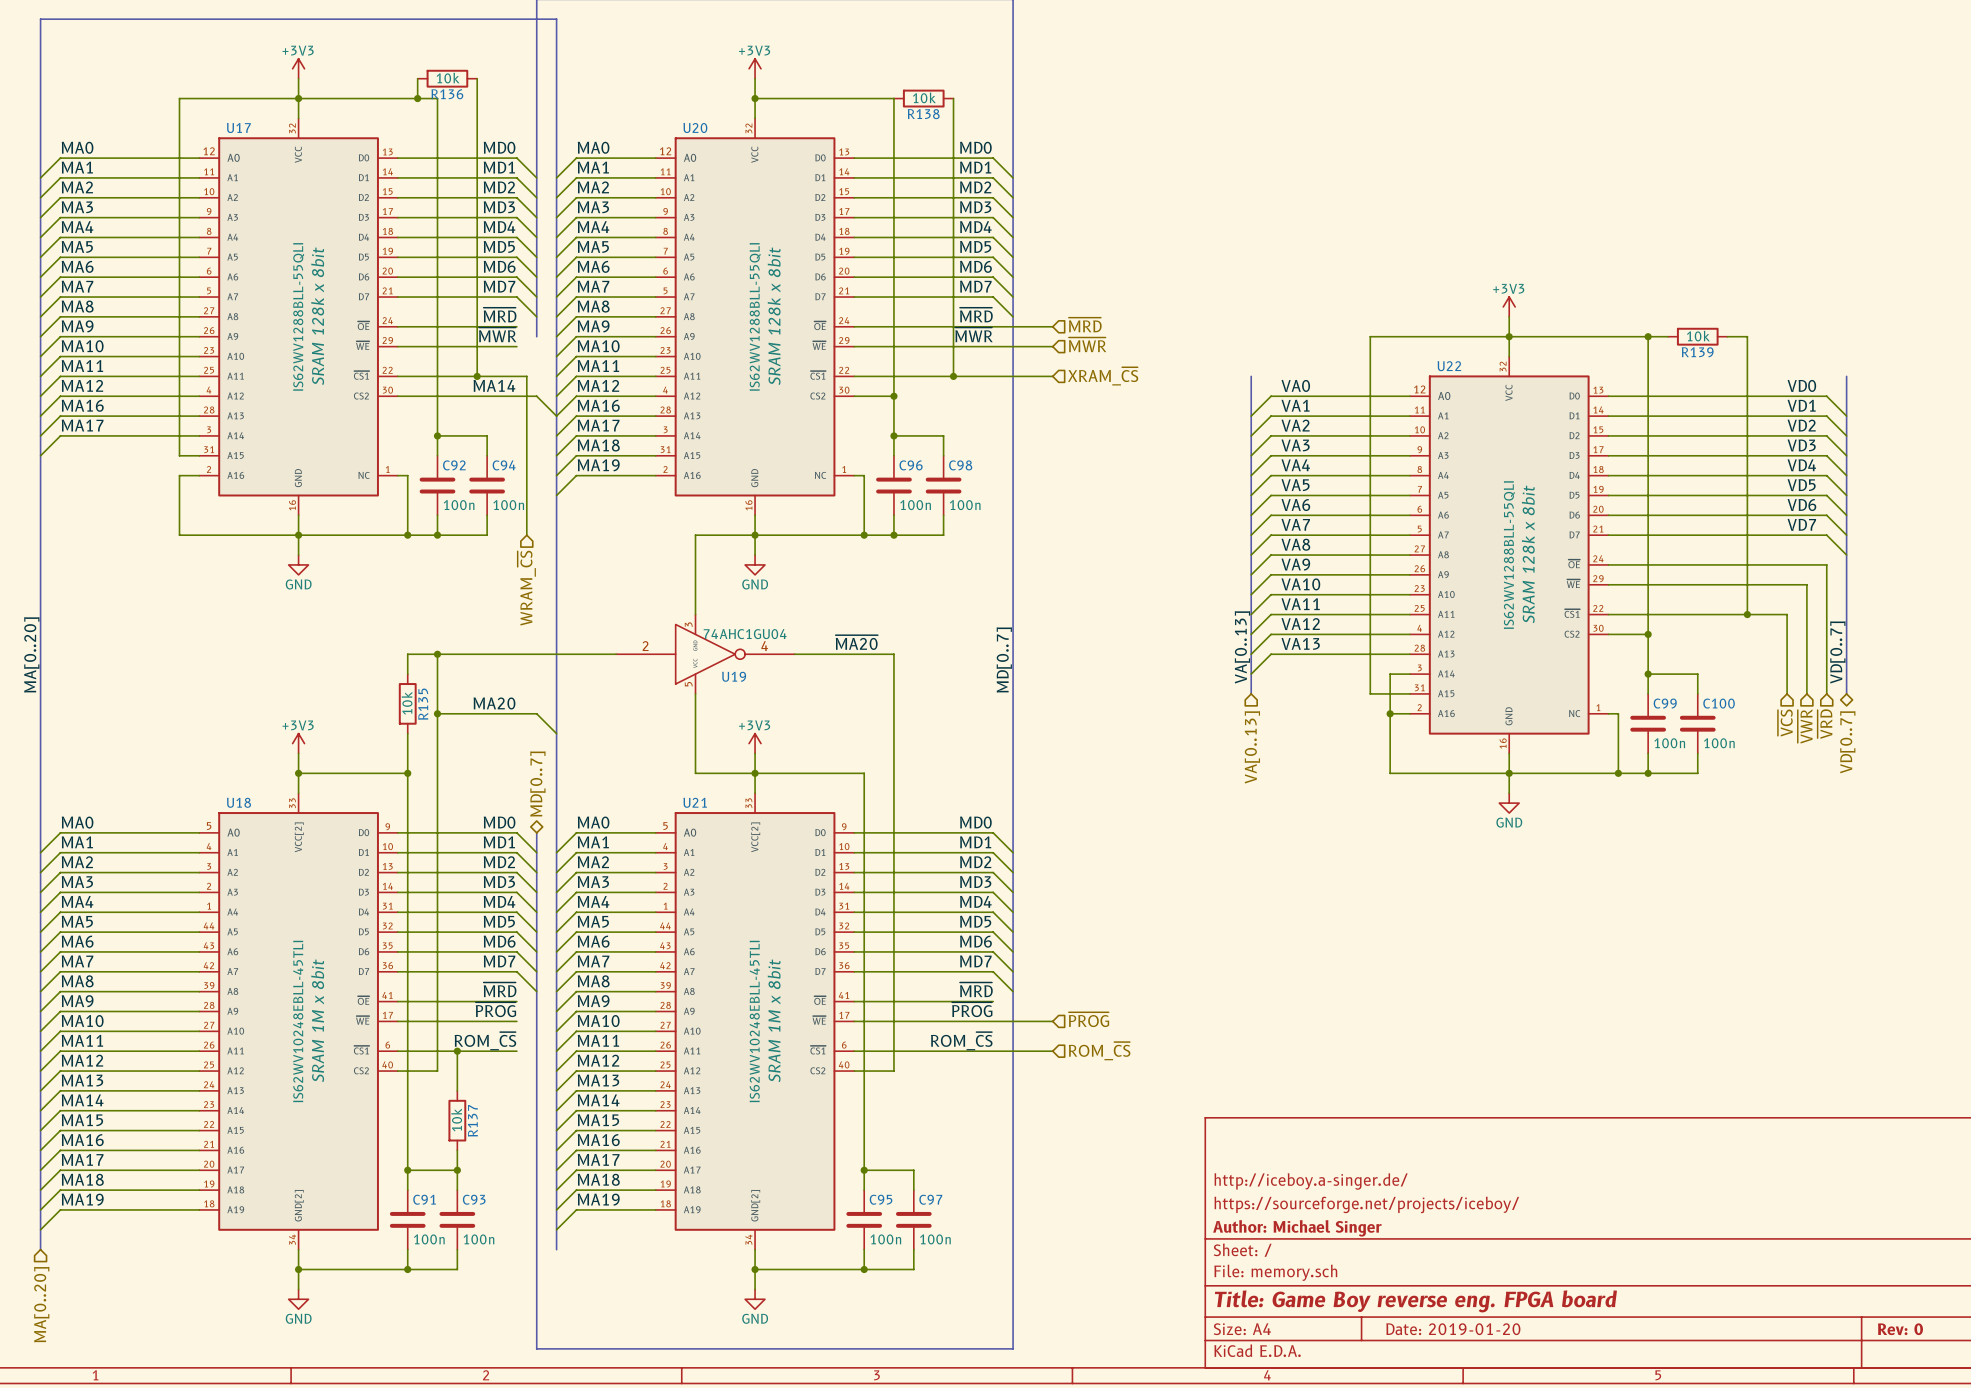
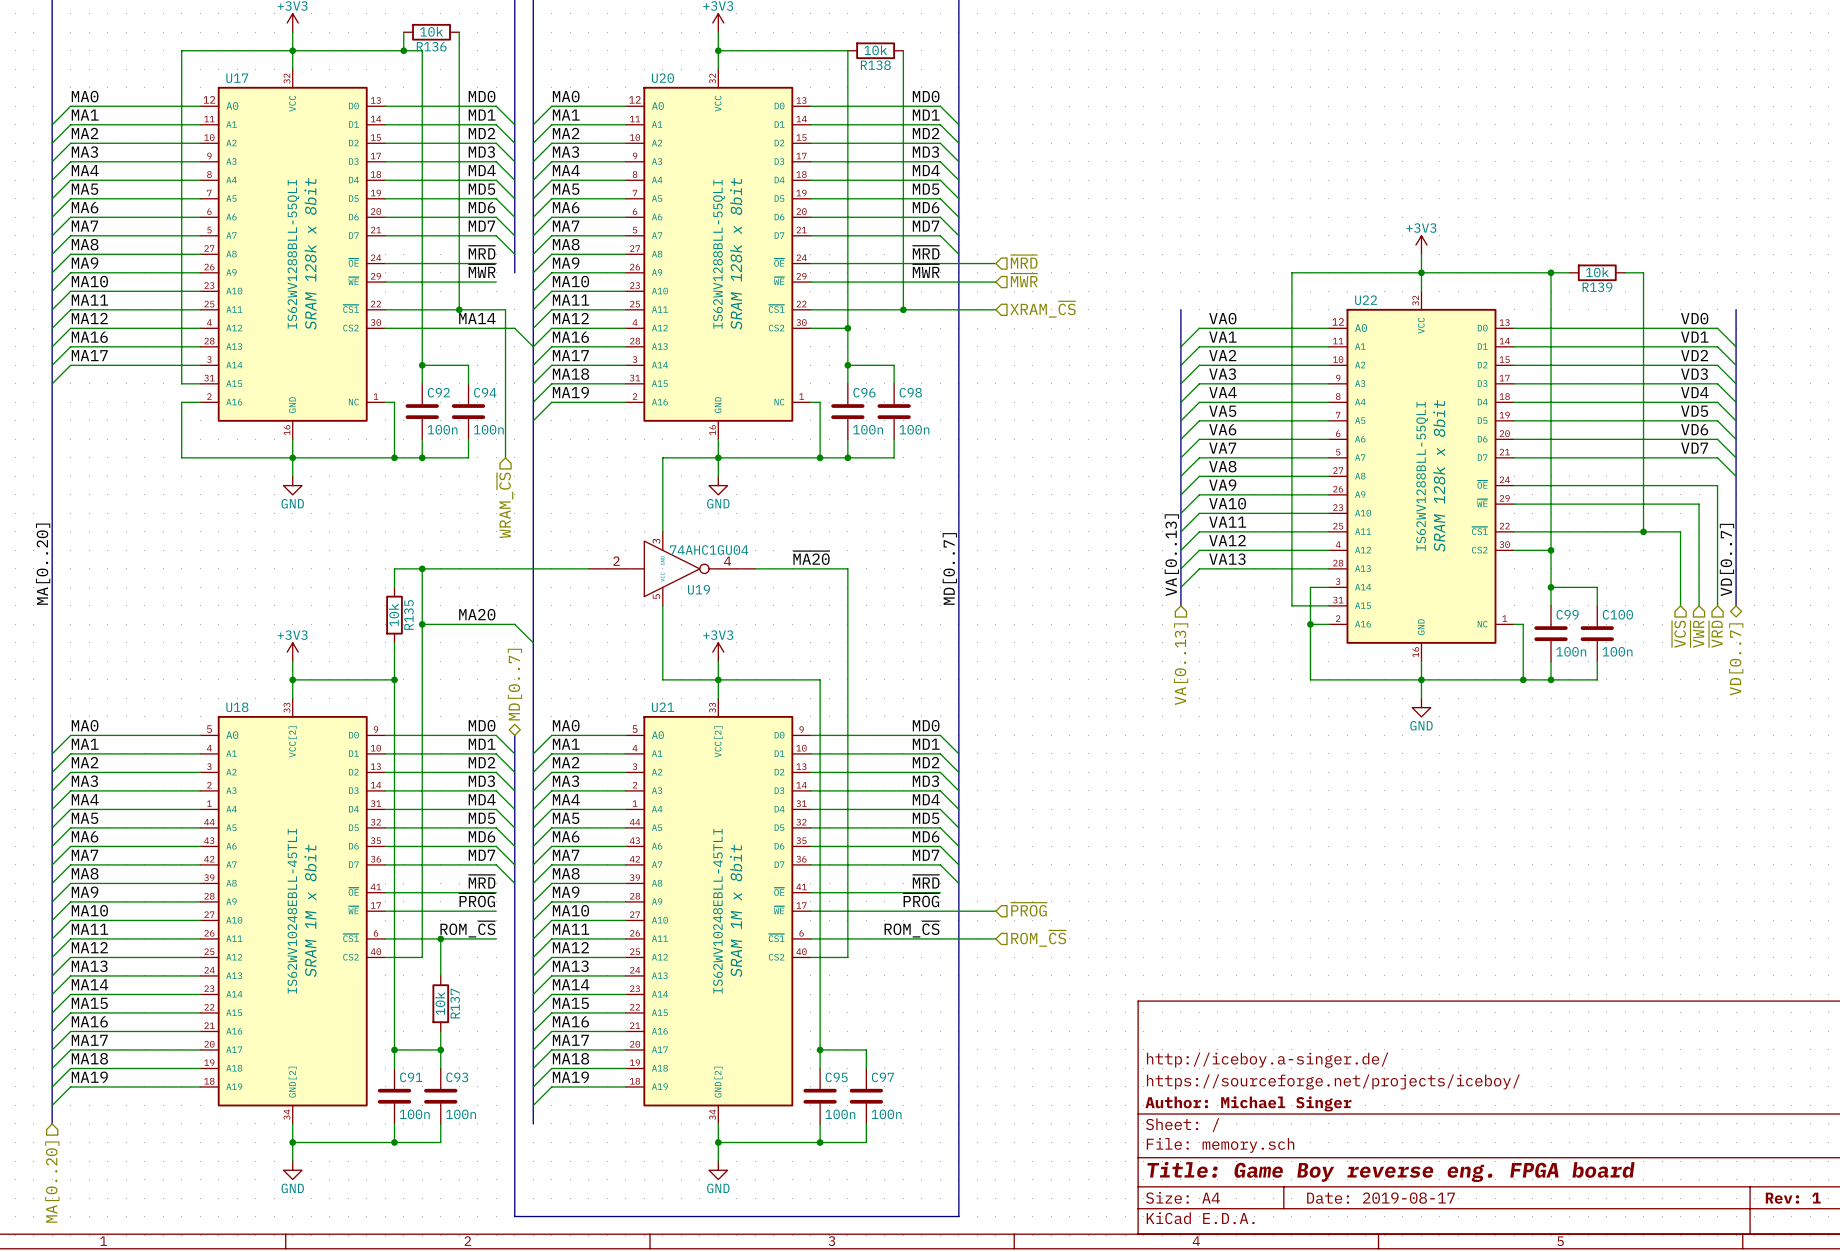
title block: Date: 2019-01-20 (1453, 1329) -> Date: 2019-08-17 (1381, 1198)
title block: Rev: 0 (1900, 1329) -> Rev: 1 (1793, 1198)

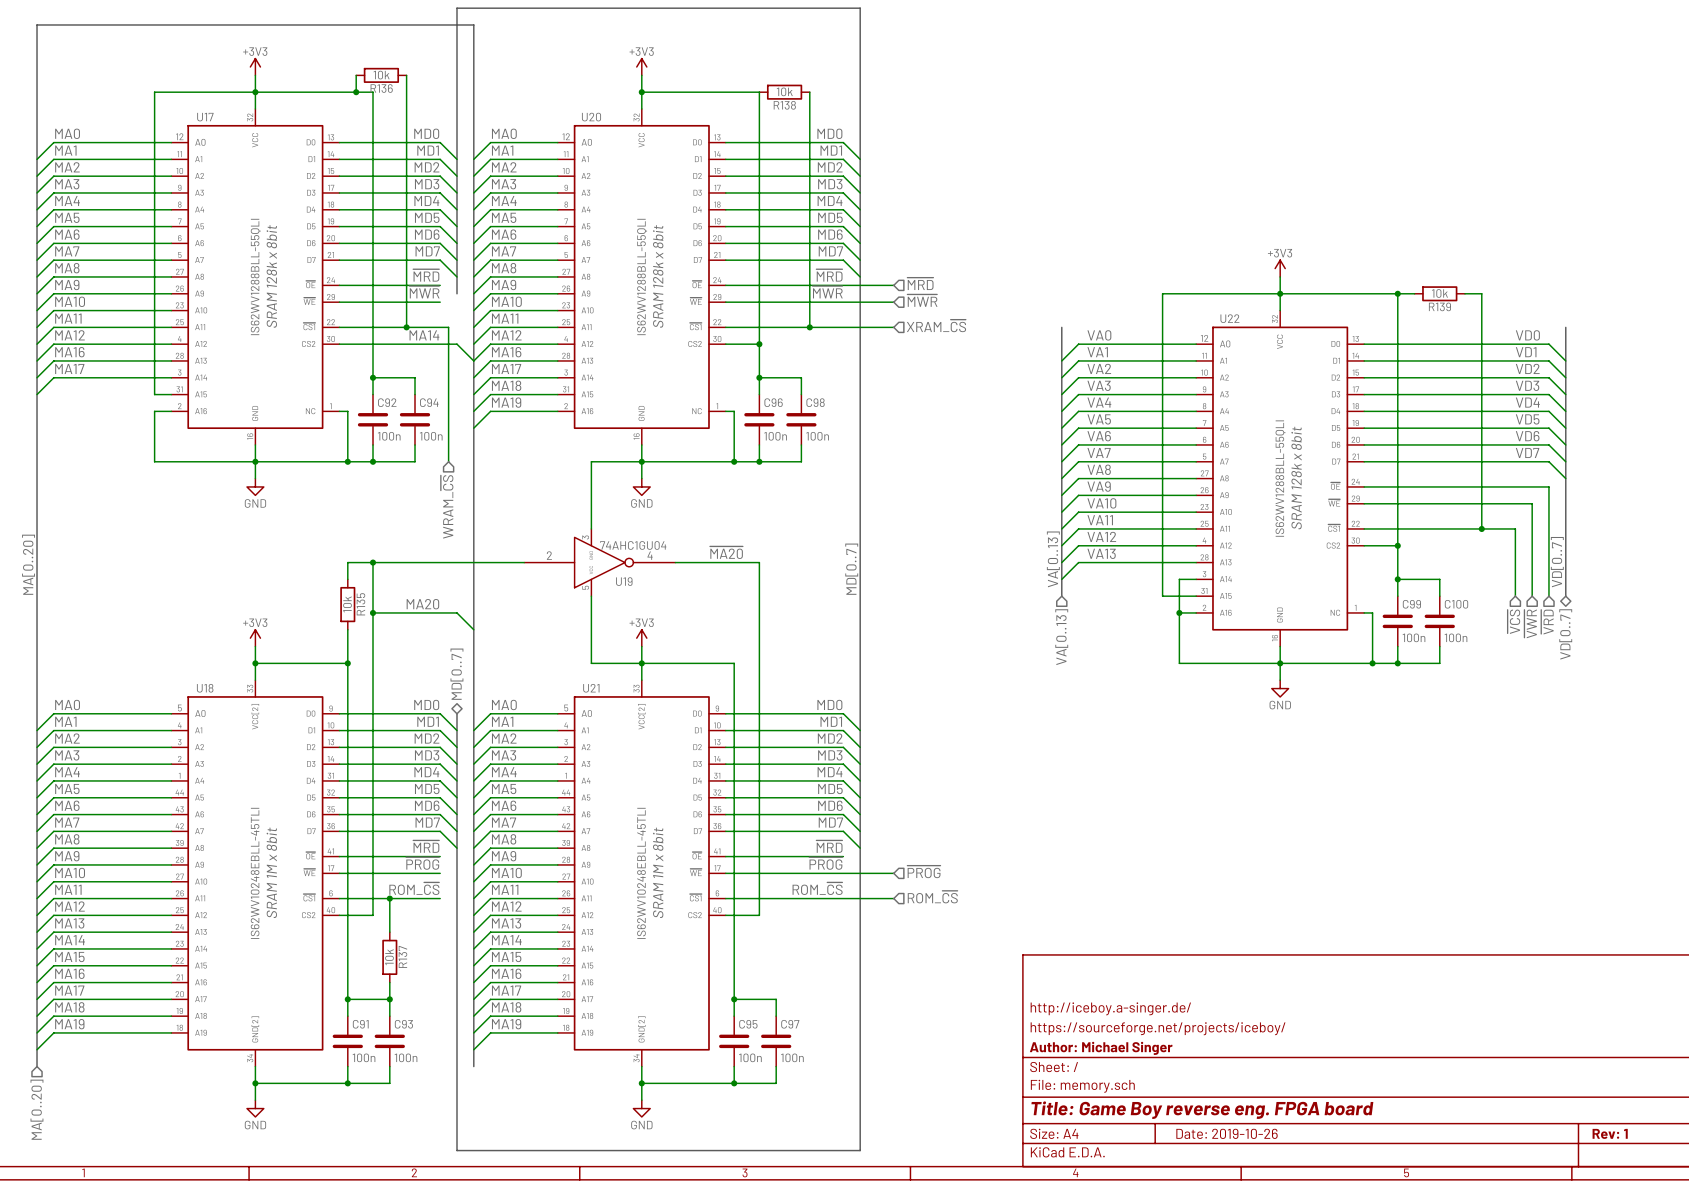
title block: Date: 2019-08-17 (1381, 1198) -> Date: 2019-10-26 (1227, 1133)

